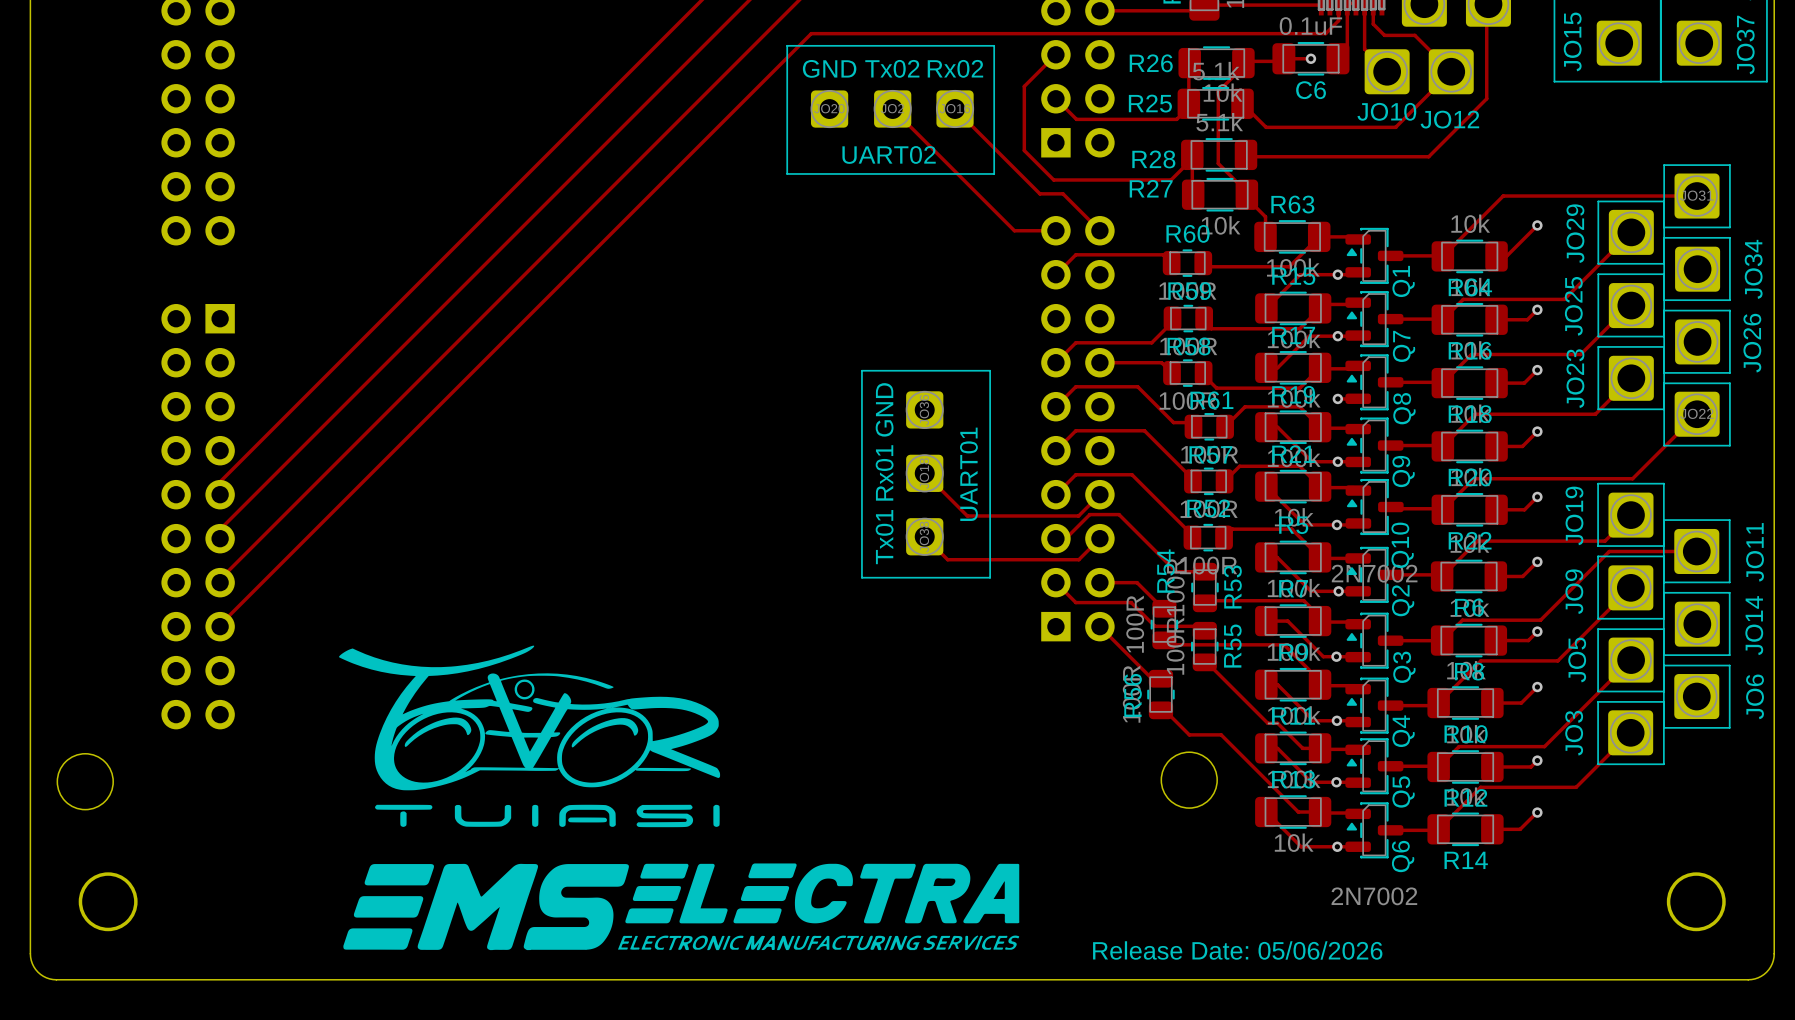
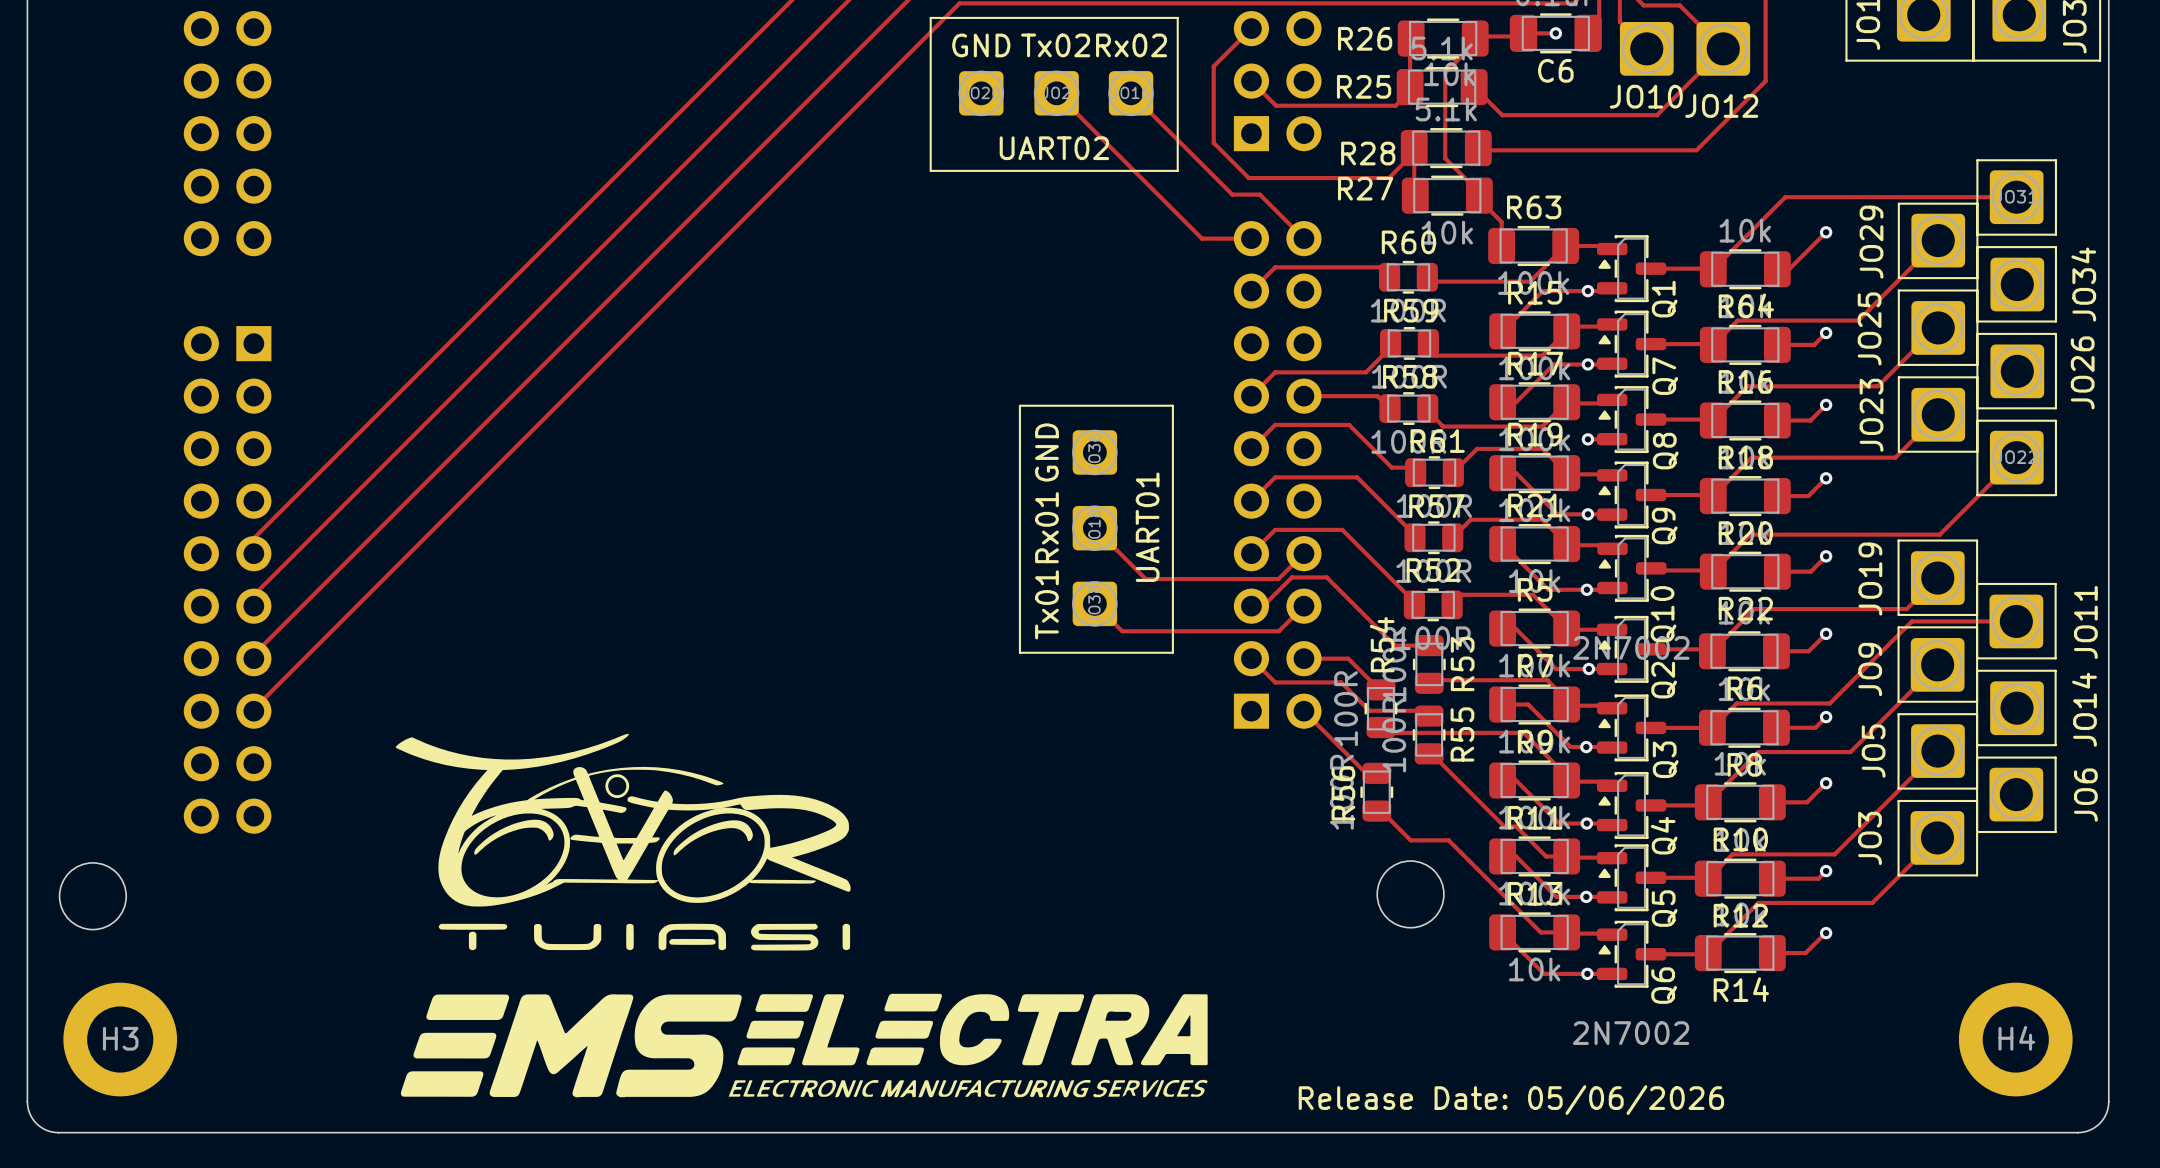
round board edge: [78, 872, 138, 932] -> none
round board edge: [1666, 872, 1726, 932] -> none
H3: none -> (120, 1039)
H4: none -> (2015, 1039)

